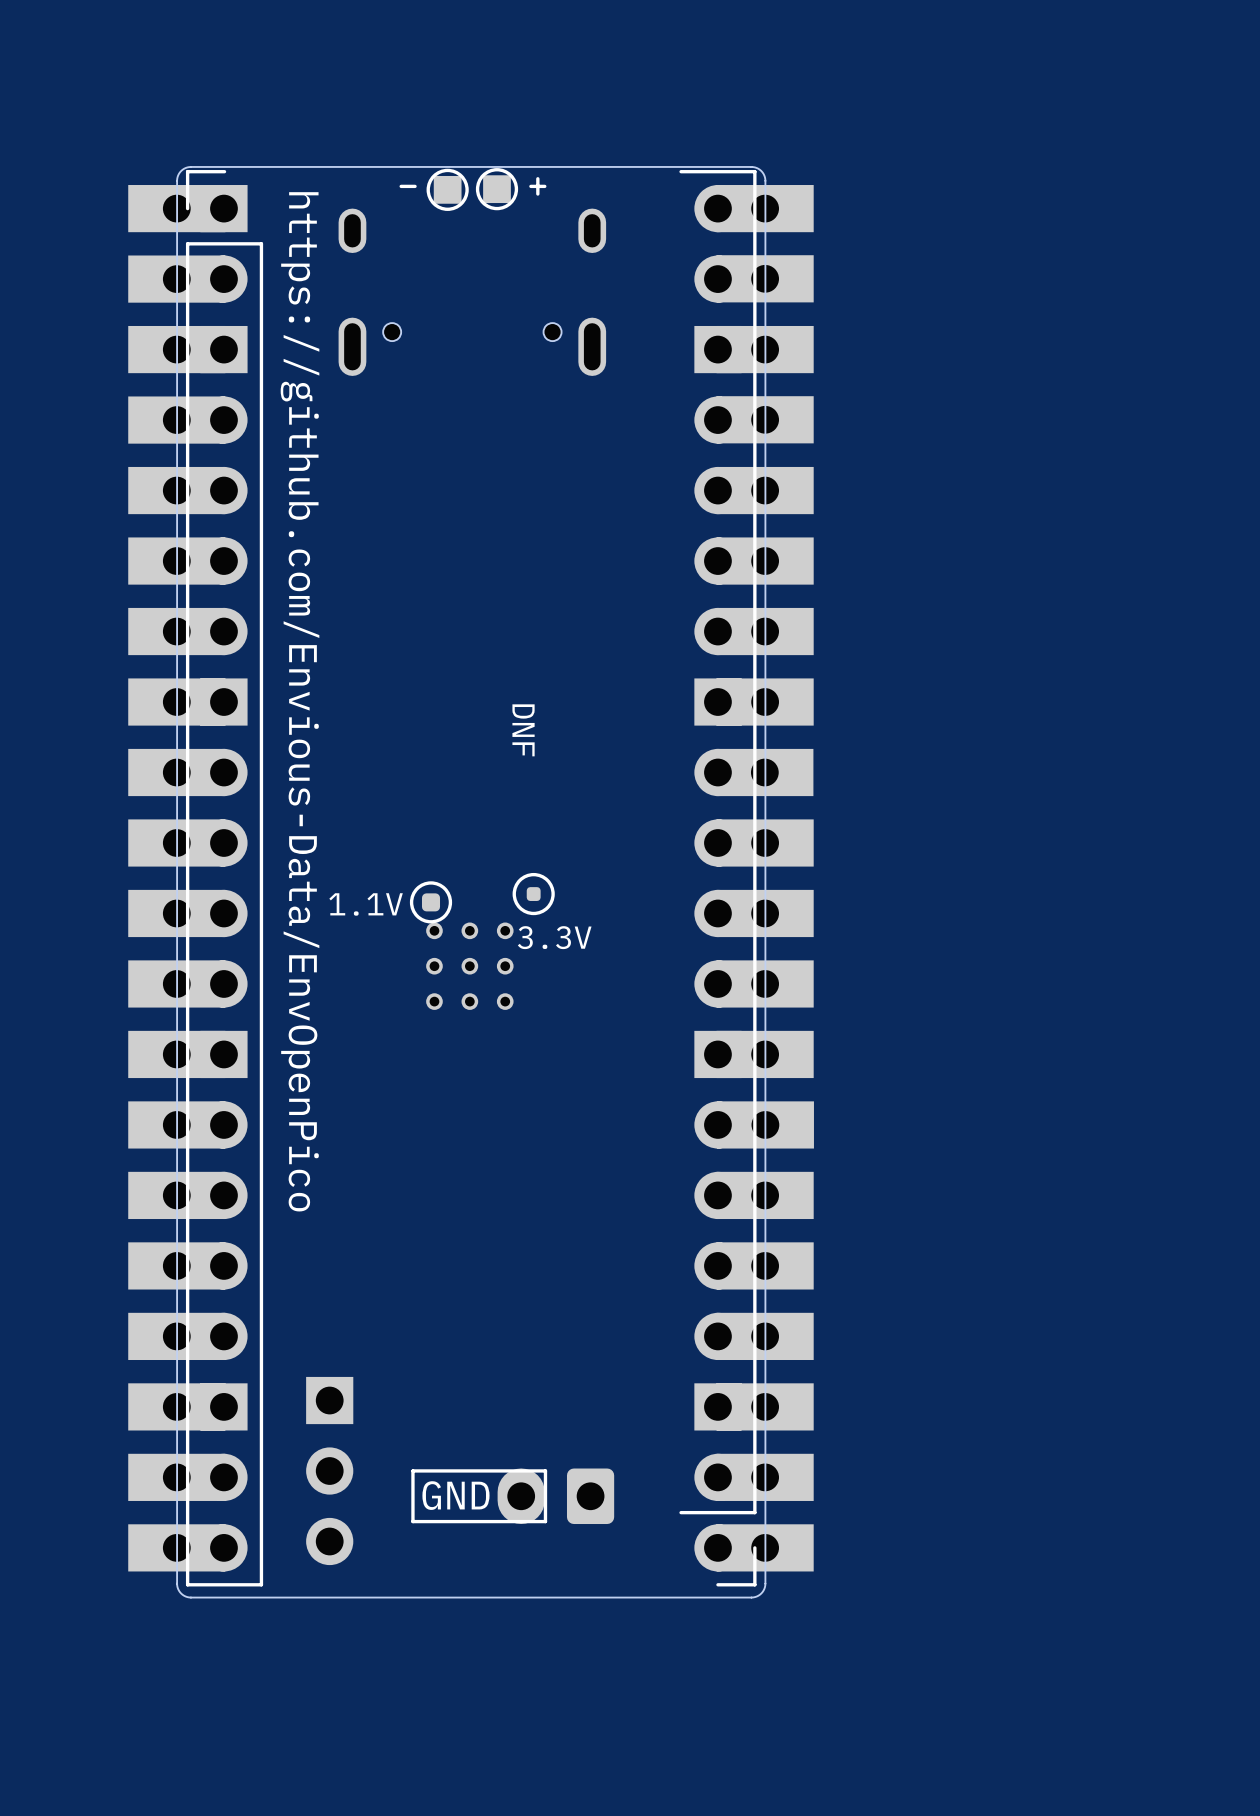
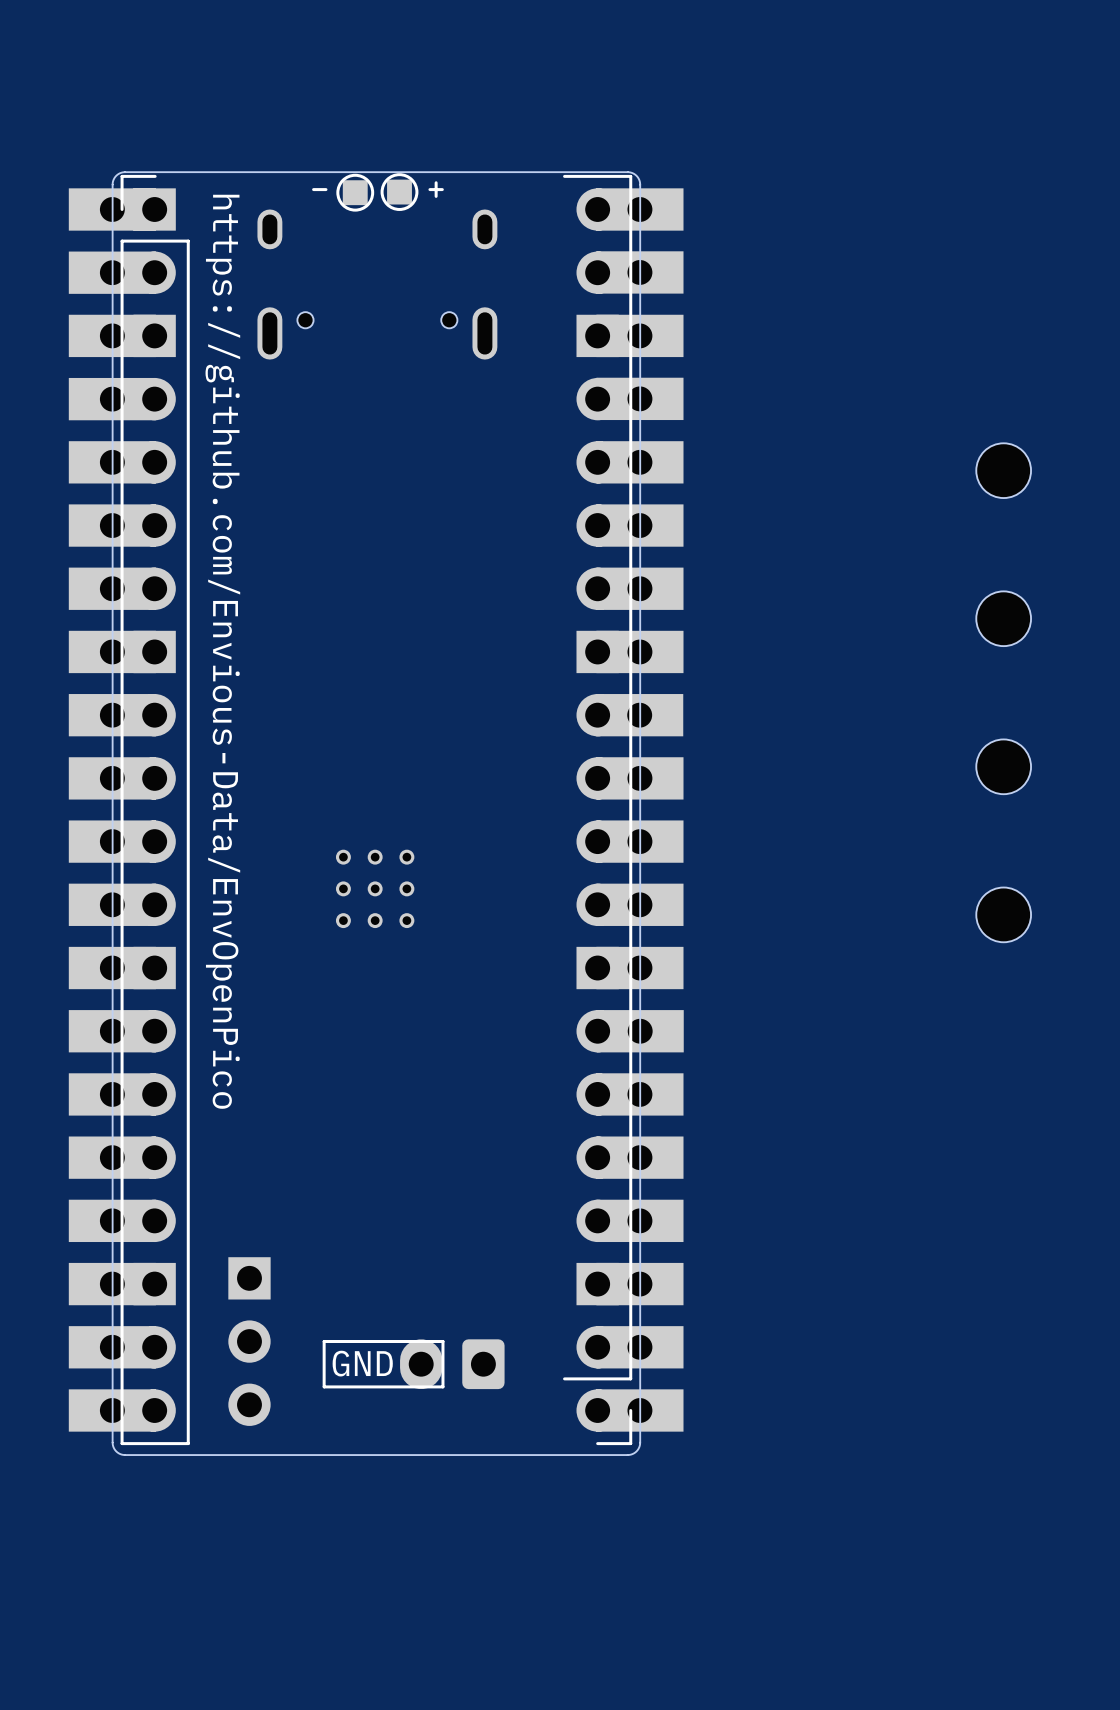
part: none -> (1003, 470)
part: none -> (1003, 618)
text: DNF (523, 730) -> none
part: none -> (1003, 766)
part: (533, 894) -> none
part: (431, 902) -> none
text: 1.1V (366, 904) -> none
text: 3.3V (554, 937) -> none
part: none -> (1003, 914)

